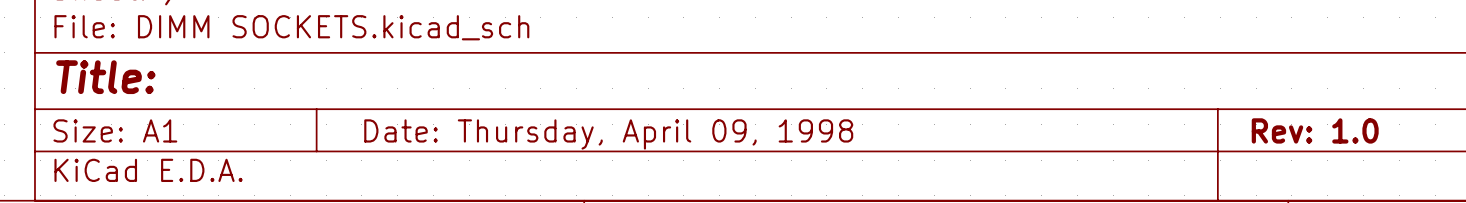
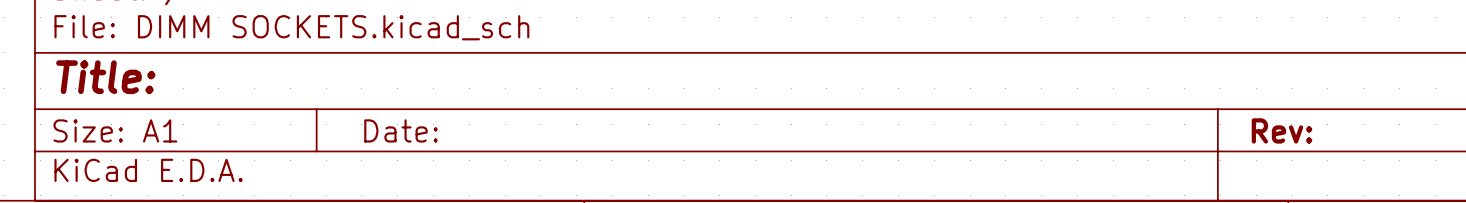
title block: Rev: 1.0 (1315, 130) -> Rev: (1282, 130)
title block: Date: Thursday, April 09, 1998 (608, 134) -> Date: (401, 130)

